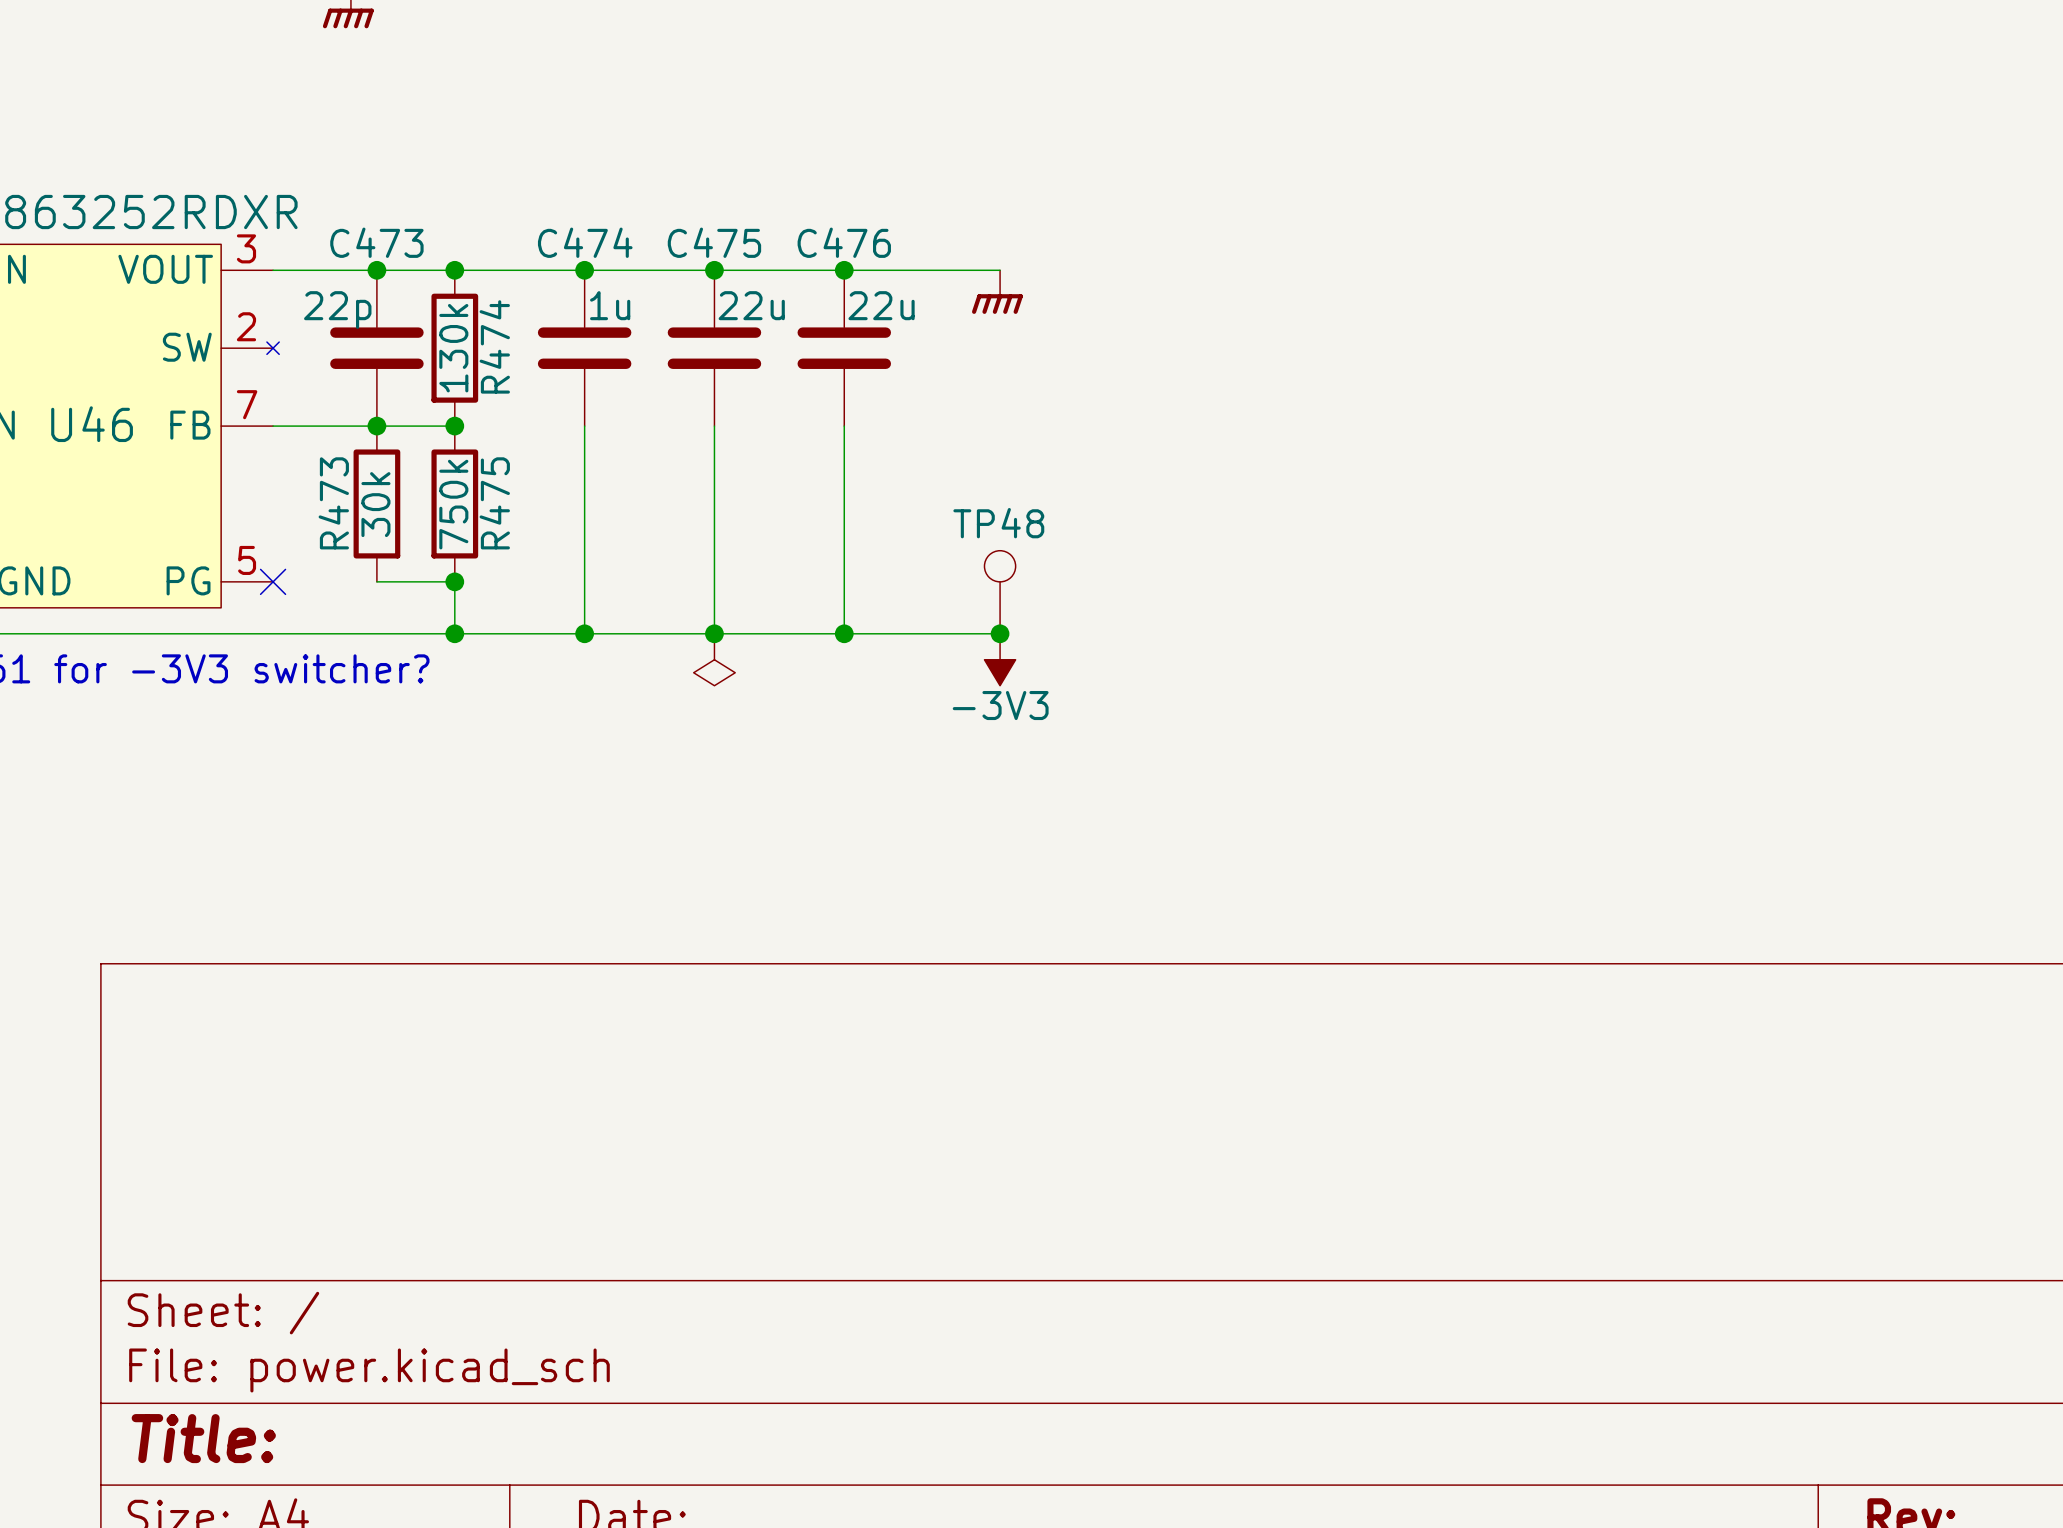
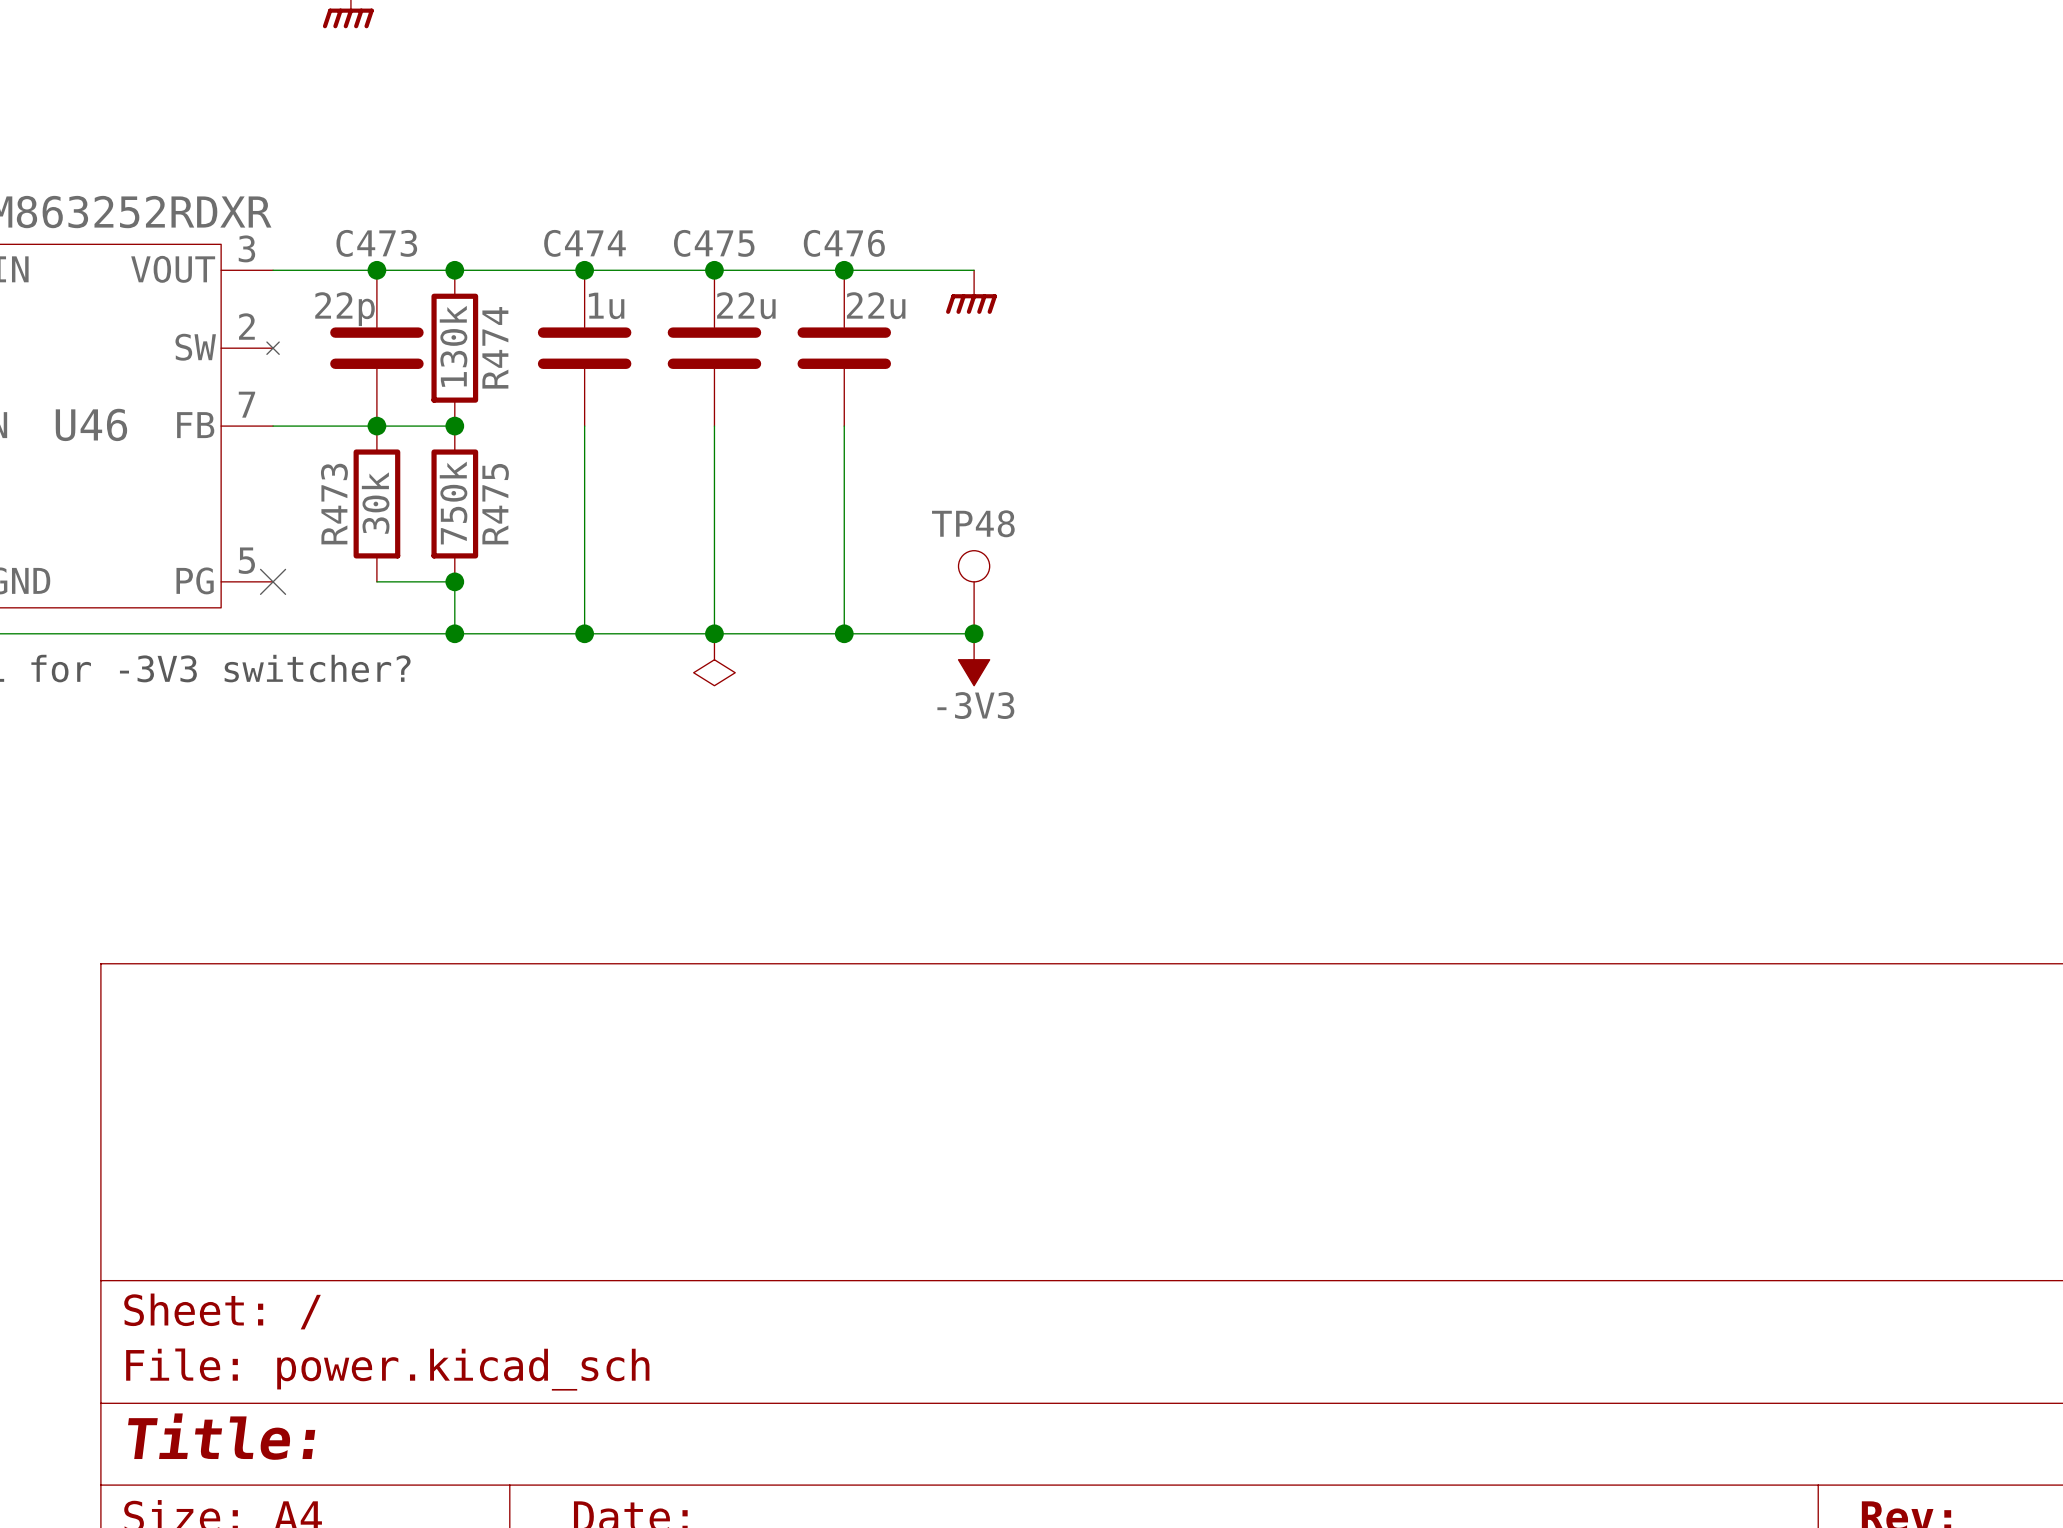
wire: (974, 270) (1000, 270) -> none
power symbol position: (997, 292) -> (971, 292)
TP48 position: (1000, 592) -> (974, 592)
wire: (974, 633) (1000, 633) -> none
junction position: (1000, 633) -> (974, 633)
power symbol position: -3V3 (1000, 659) -> -3V3 (974, 659)

